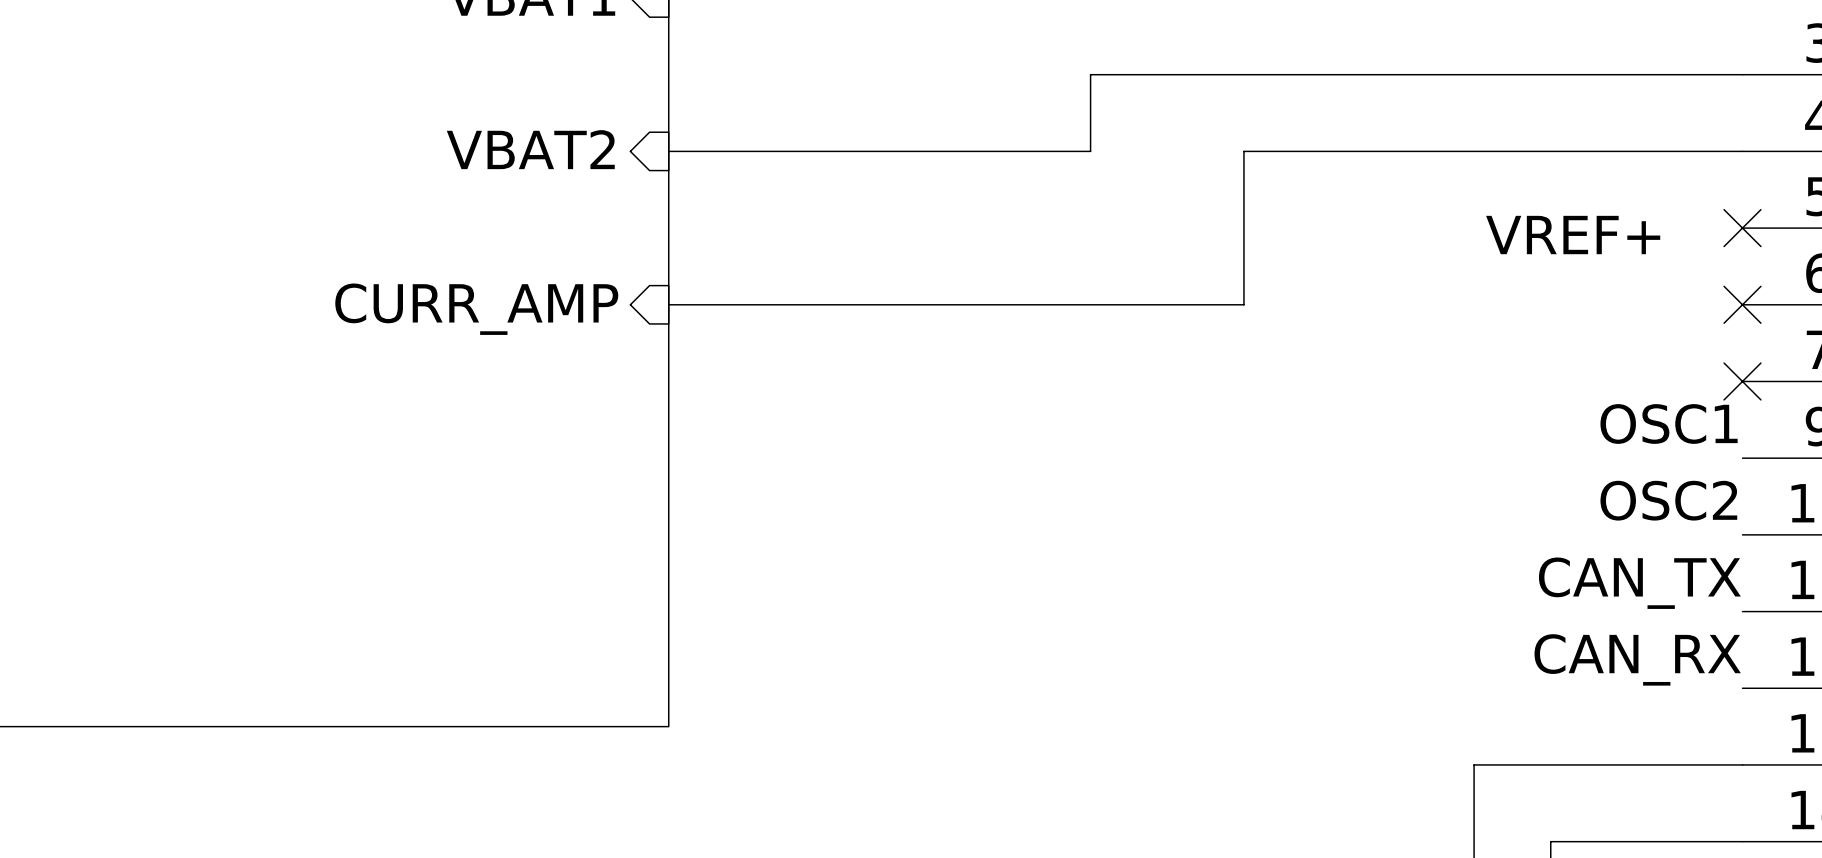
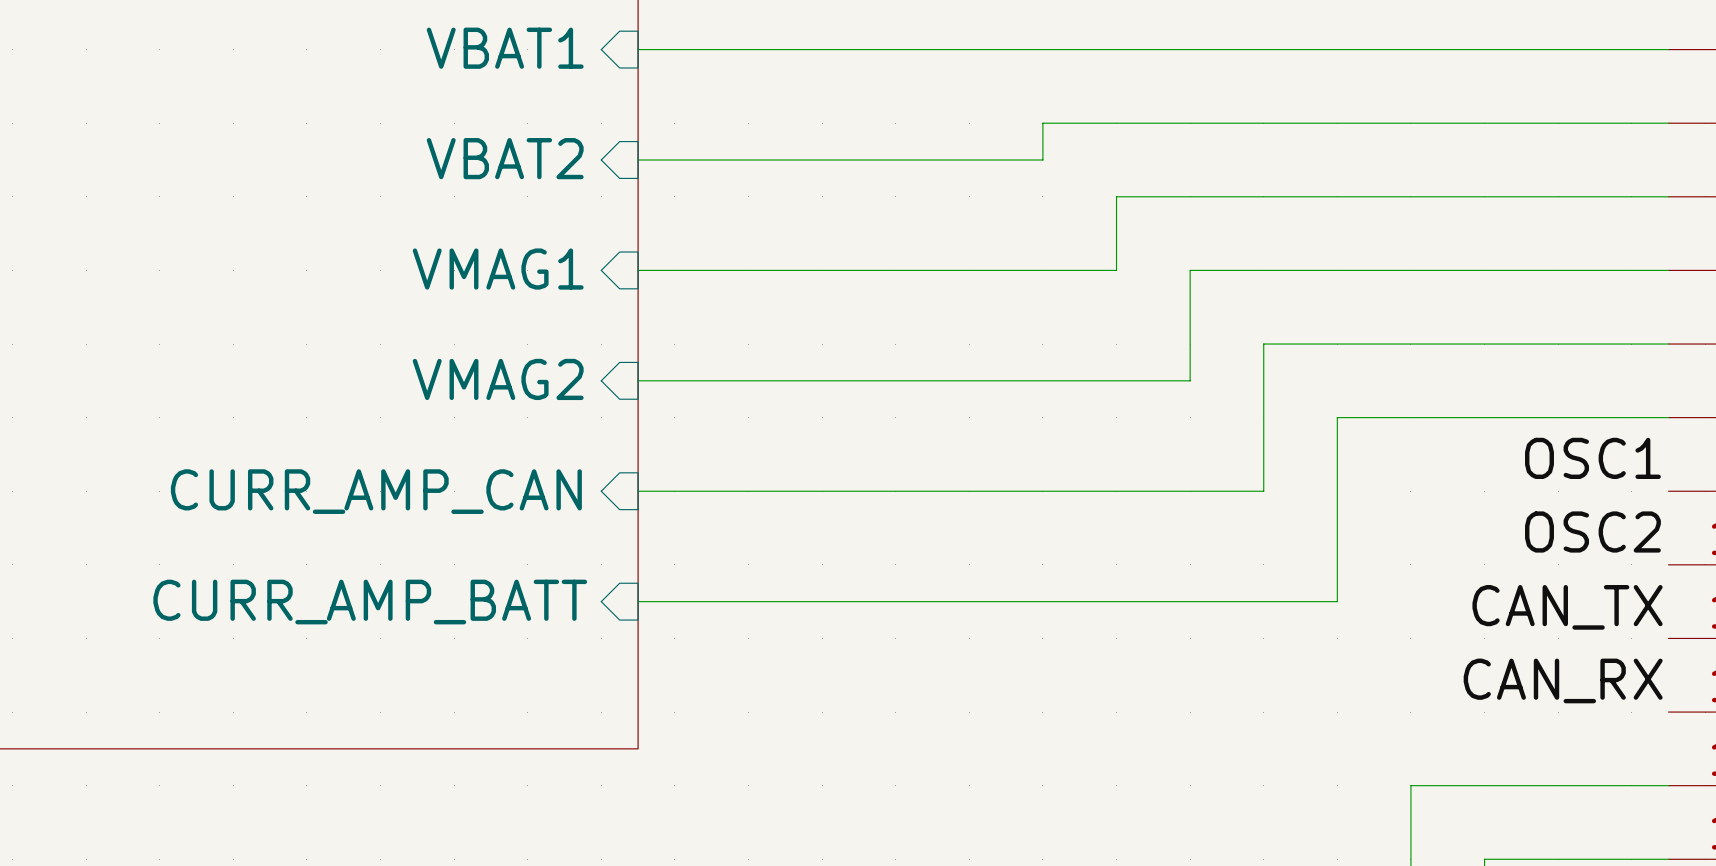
wire: (1090, 113) (1090, 151) (668, 151) -> (1042, 160) (638, 160)
sheet pin position: VBAT2 (530, 149) -> VBAT2 (505, 158)
wire: (1243, 151) (1243, 228) -> (1668, 270) (1190, 270)
wire: none -> (1190, 196) (1116, 196) (1116, 270) (638, 270)
sheet pin: none -> VMAG1 (498, 269)
no-connect mark: (1742, 228) -> none
text: VREF+ (1573, 235) -> none
wire: (668, 304) (1243, 304) -> (638, 380) (1190, 380) (1190, 344)
wire: none -> (1668, 344) (1263, 344) (1263, 491) (638, 491)
no-connect mark: (1742, 304) -> none
sheet pin: CURR_AMP (476, 309) -> none
sheet pin: none -> VMAG2 (498, 379)
wire: none -> (1668, 417) (1337, 417) (1337, 601) (638, 601)
no-connect mark: (1742, 381) -> none
sheet pin: none -> CURR_AMP_CAN (376, 491)
sheet pin: none -> CURR_AMP_BATT (370, 602)

